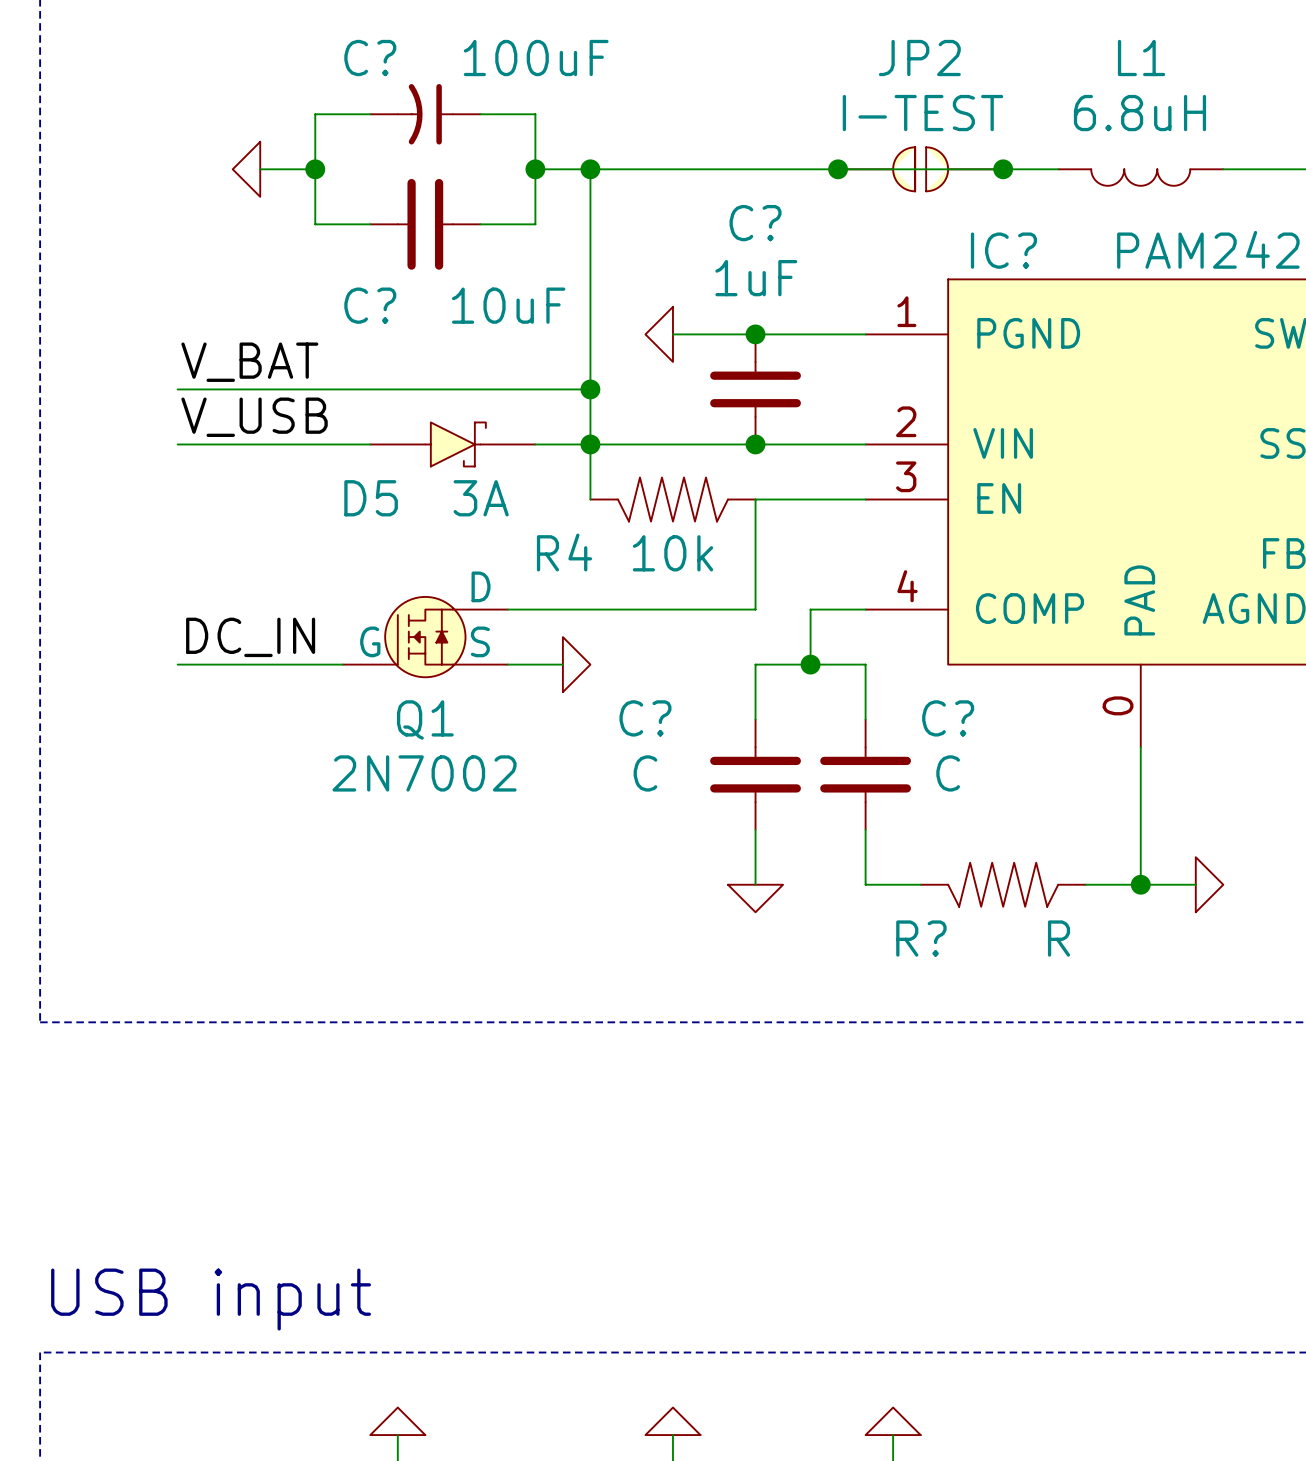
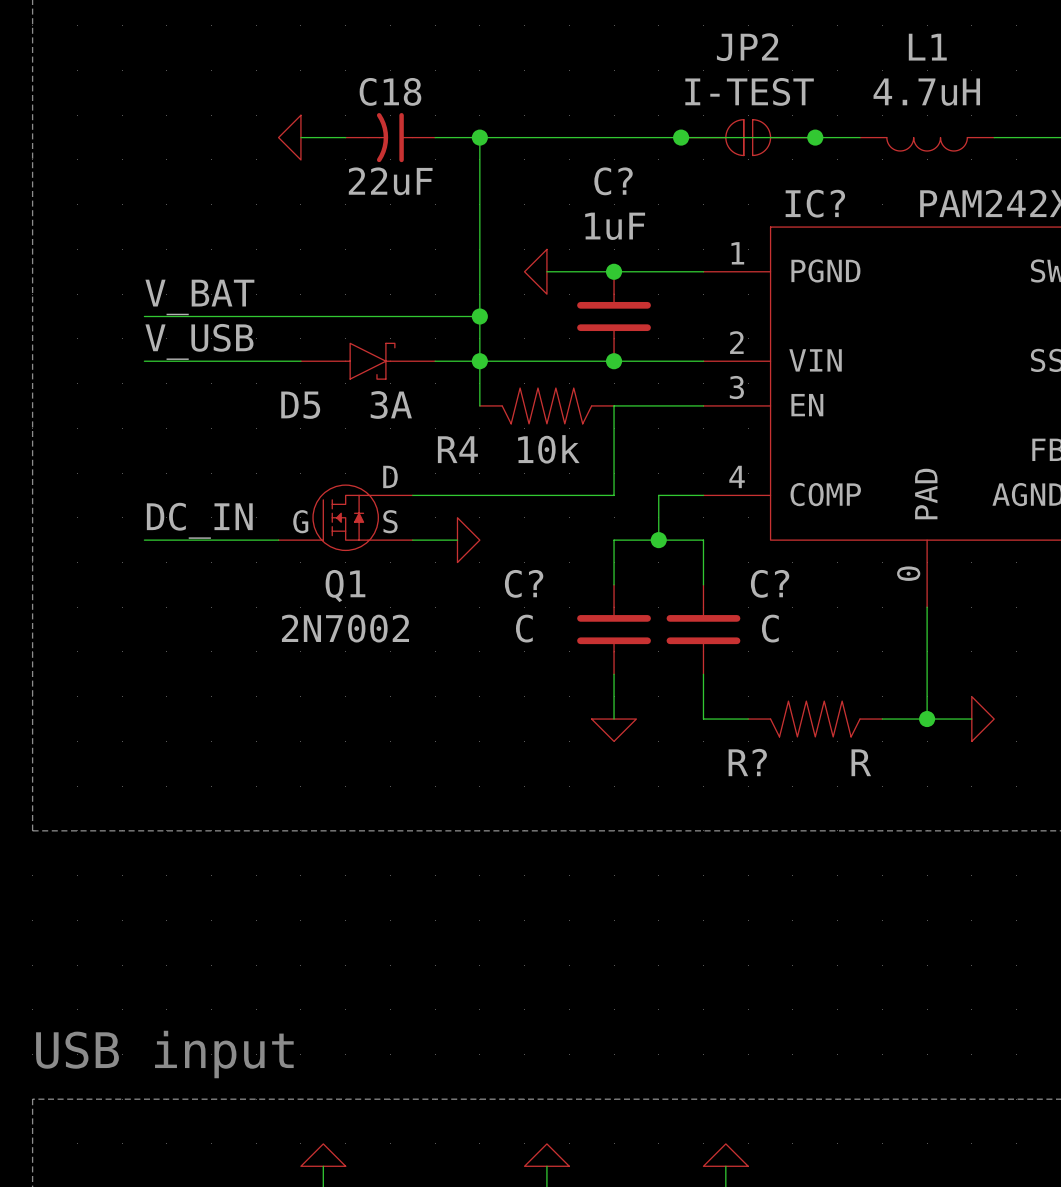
L1 value: 6.8uH (1139, 113) -> 4.7uH (926, 92)
wire: (370, 114) (315, 114) (315, 224) (370, 224) -> none
C?: 100uF (425, 114) -> none
wire: (480, 114) (535, 114) (535, 224) (480, 224) -> none
power symbol position: (246, 169) -> (289, 137)
wire: (260, 169) (315, 169) -> (300, 137) (345, 137)
junction: (315, 169) -> none
C18: none -> 22uF (390, 137)
junction: (535, 169) -> none
C?: 10uF (425, 224) -> none

